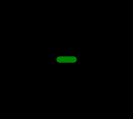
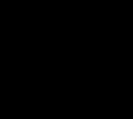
track: (73, 59) (59, 59) -> none

